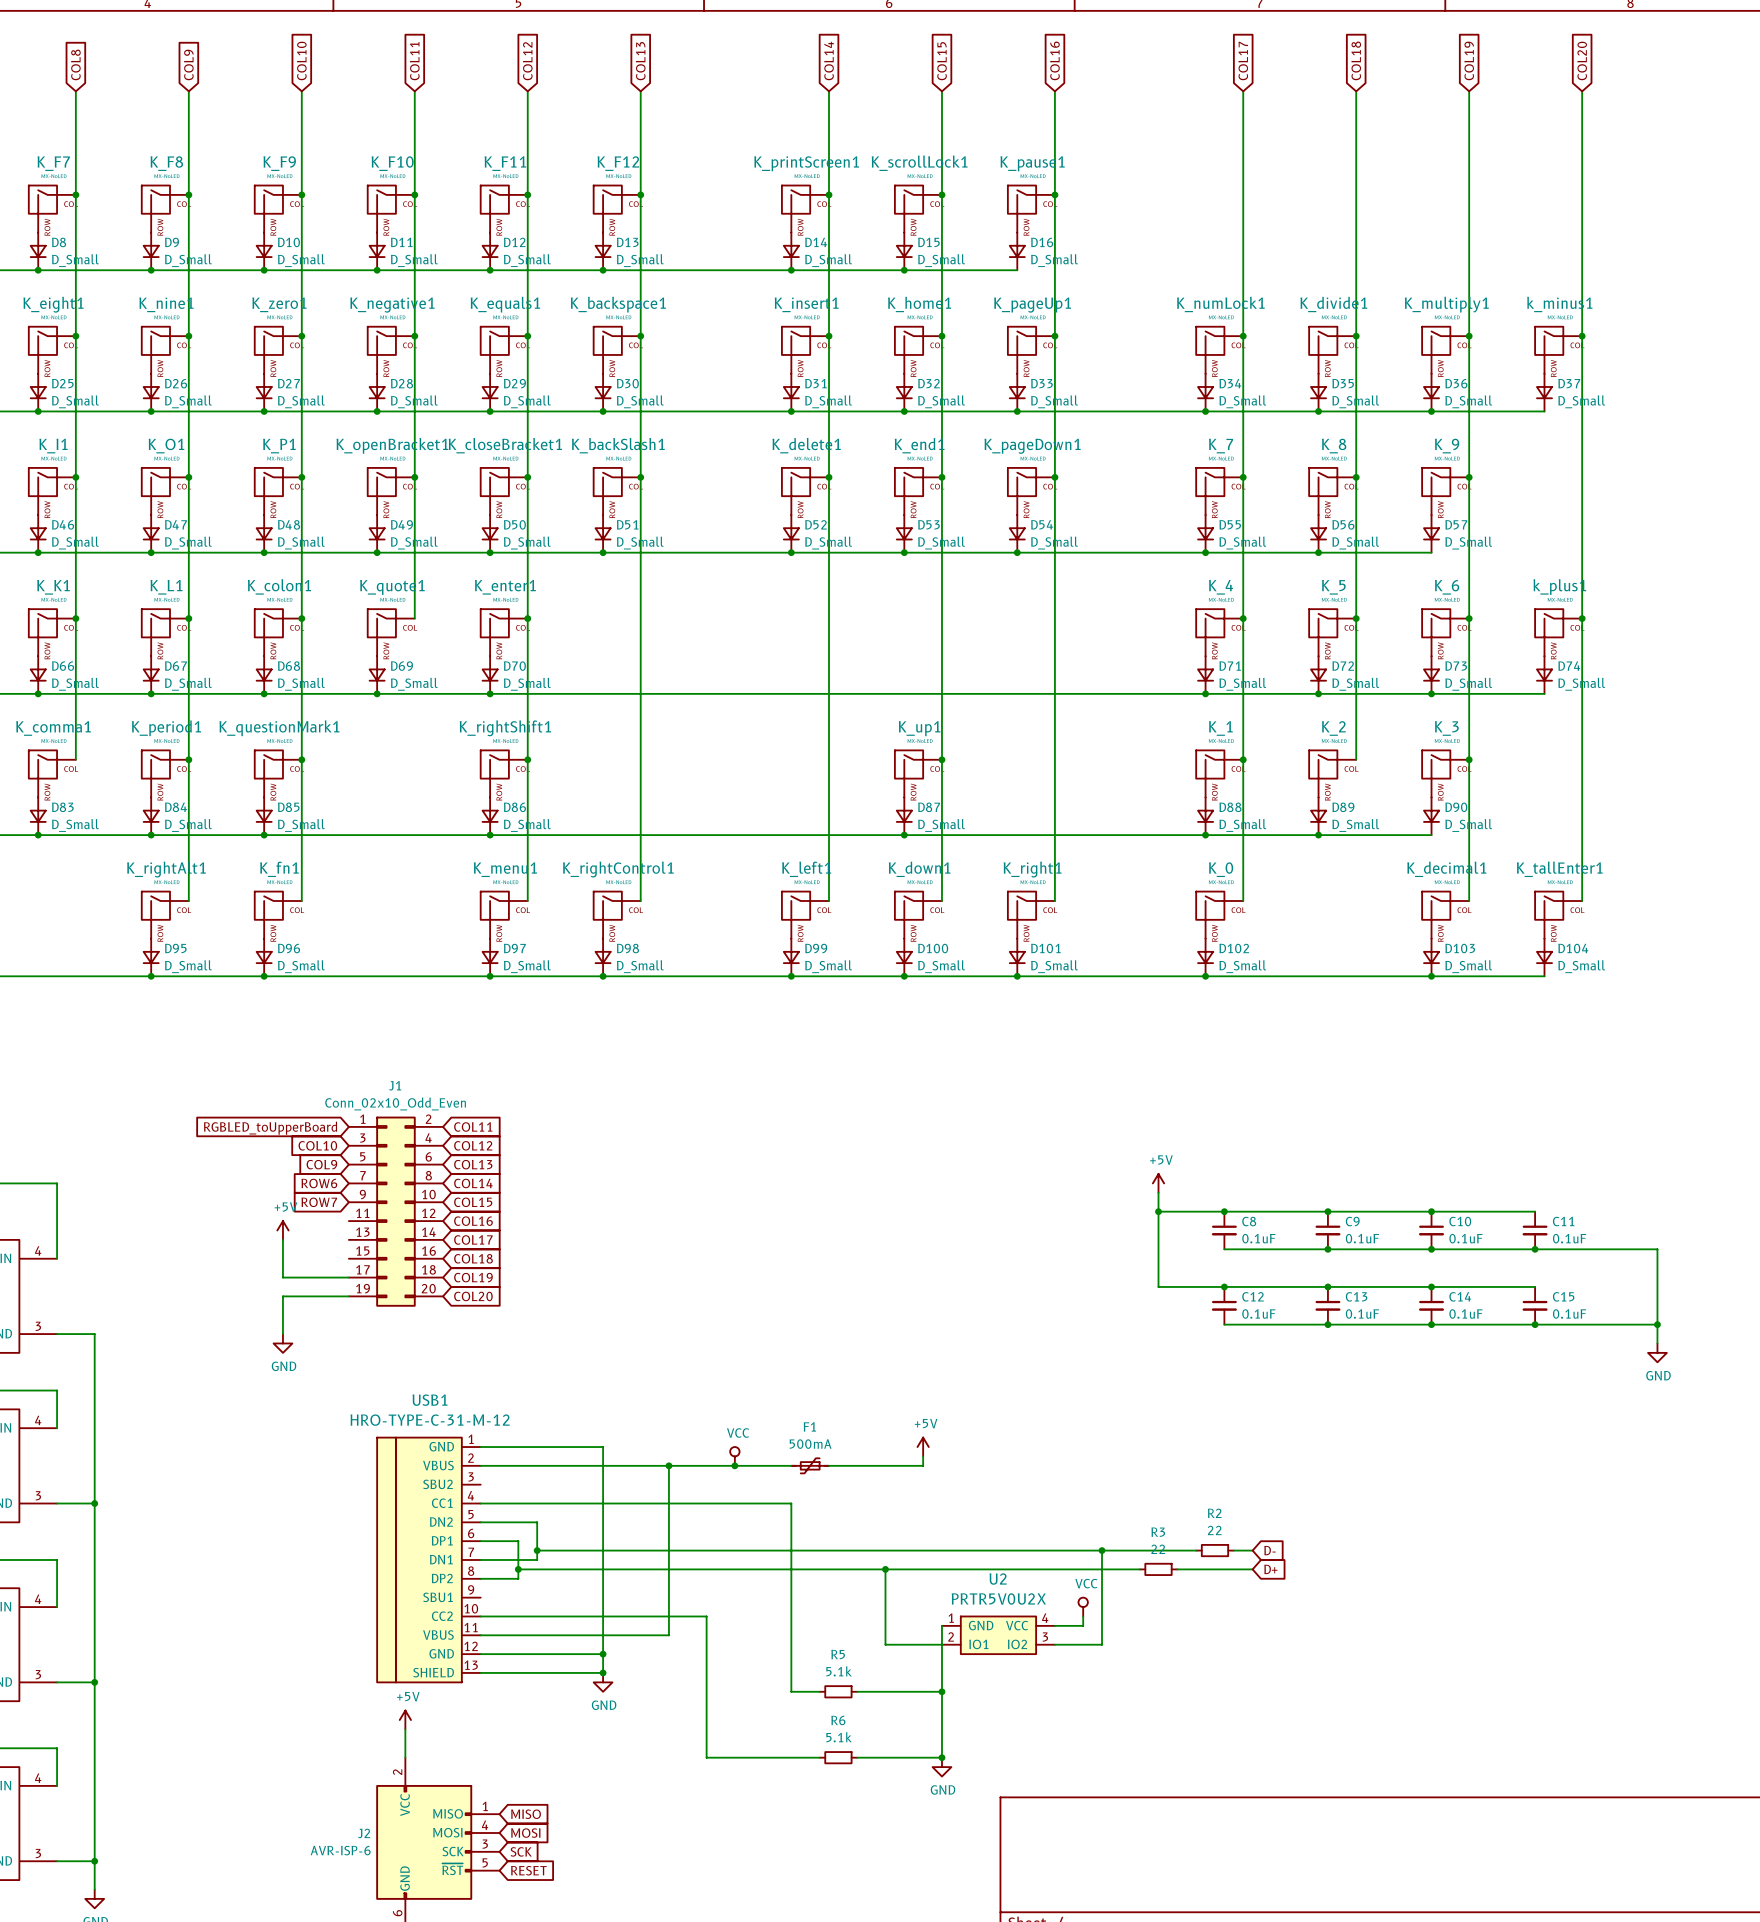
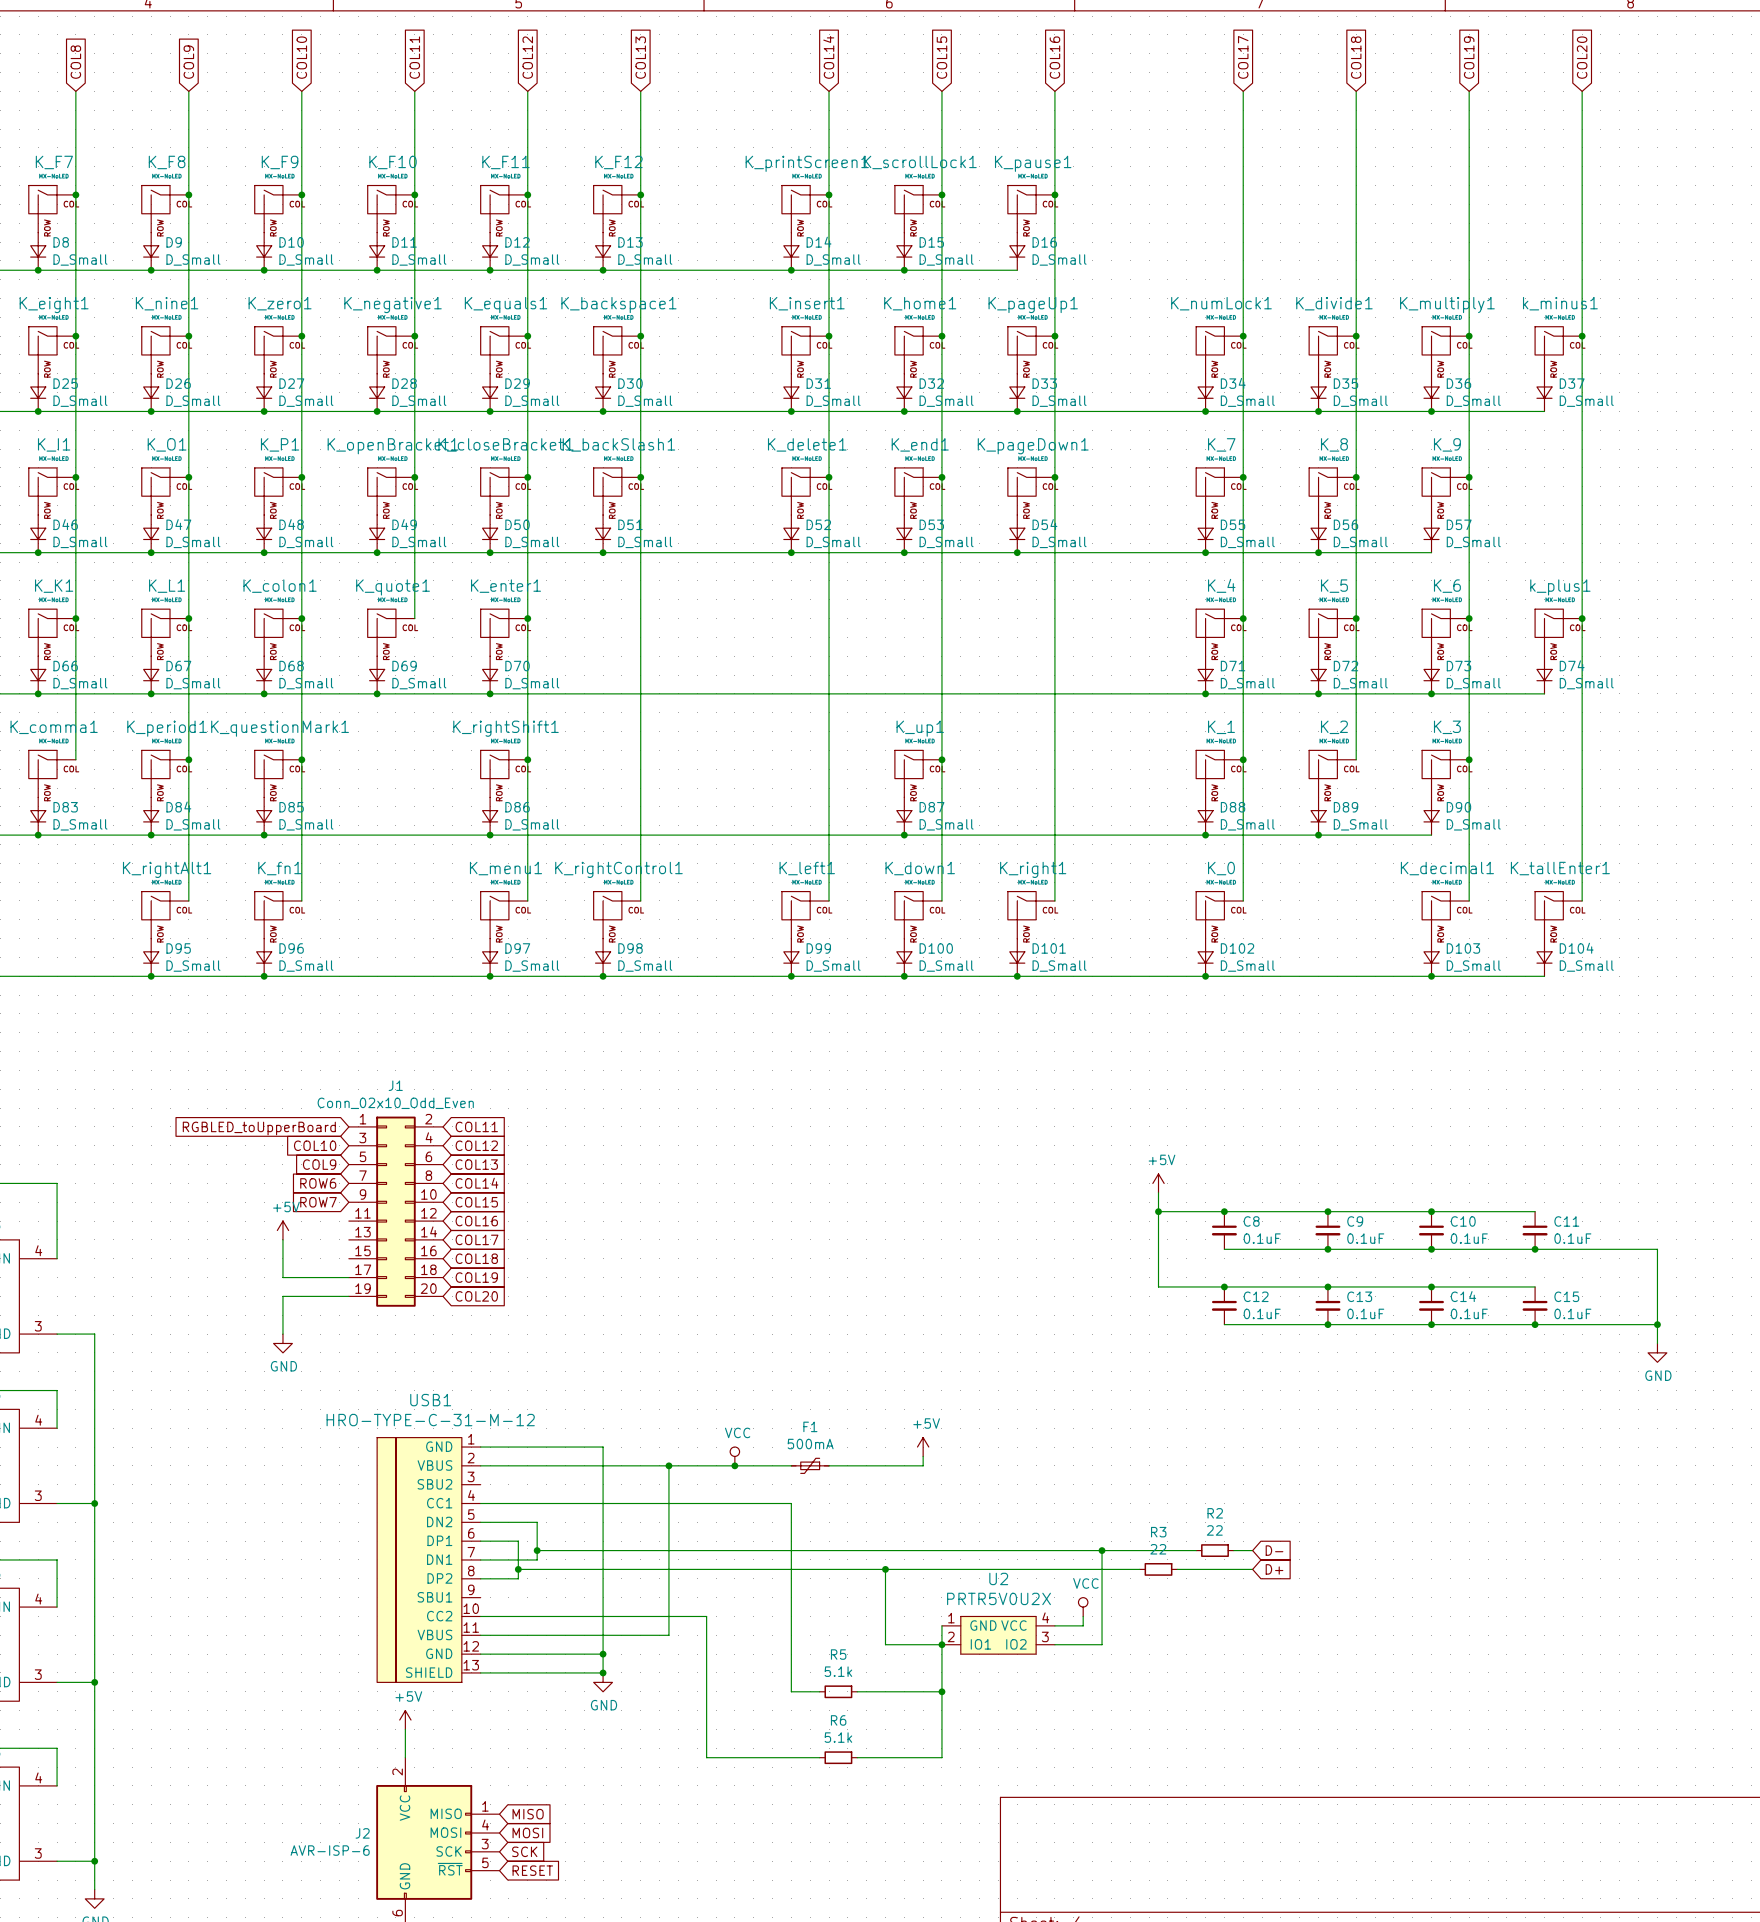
junction: none -> (941, 1644)
junction: (941, 1757) -> none
power symbol: GND (941, 1767) -> none

